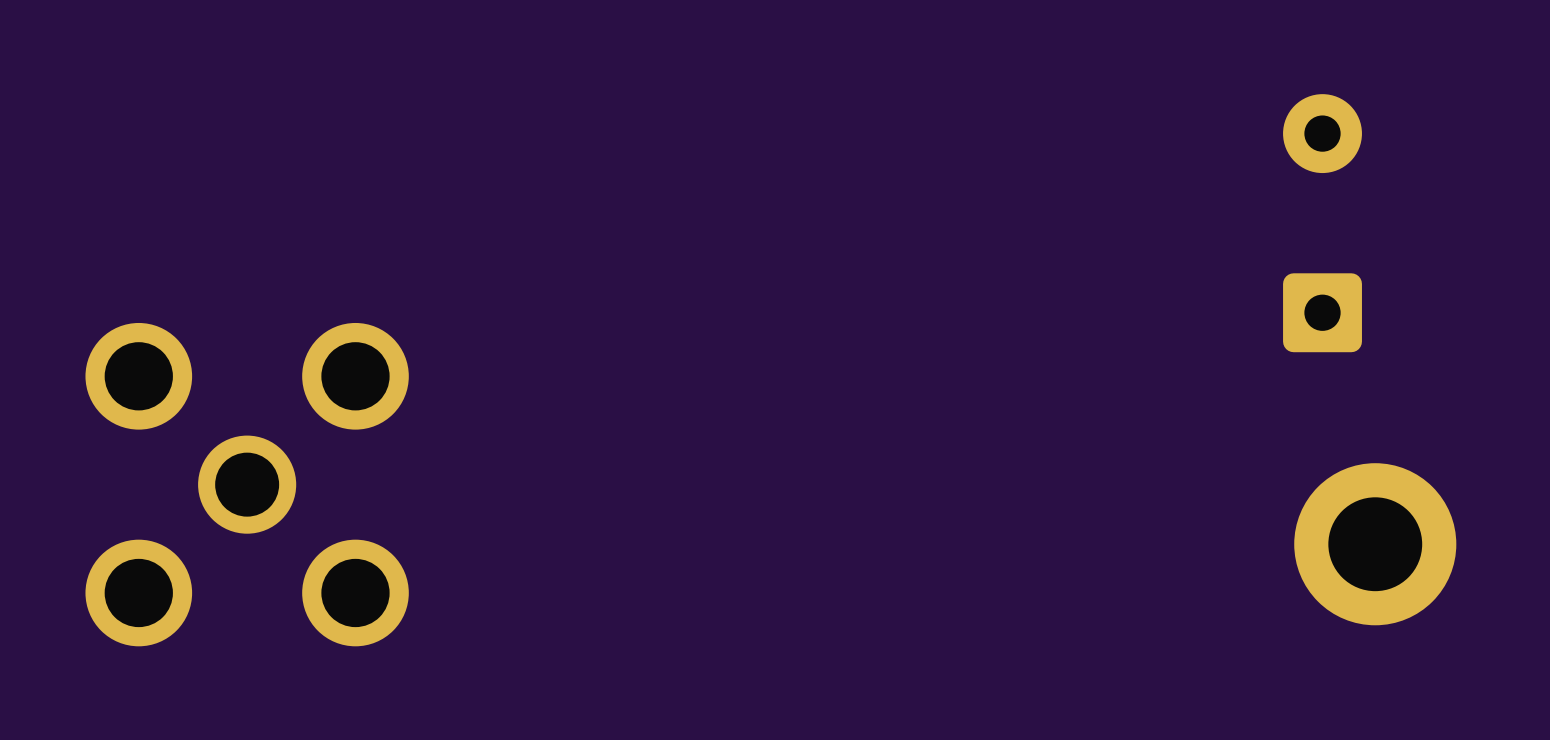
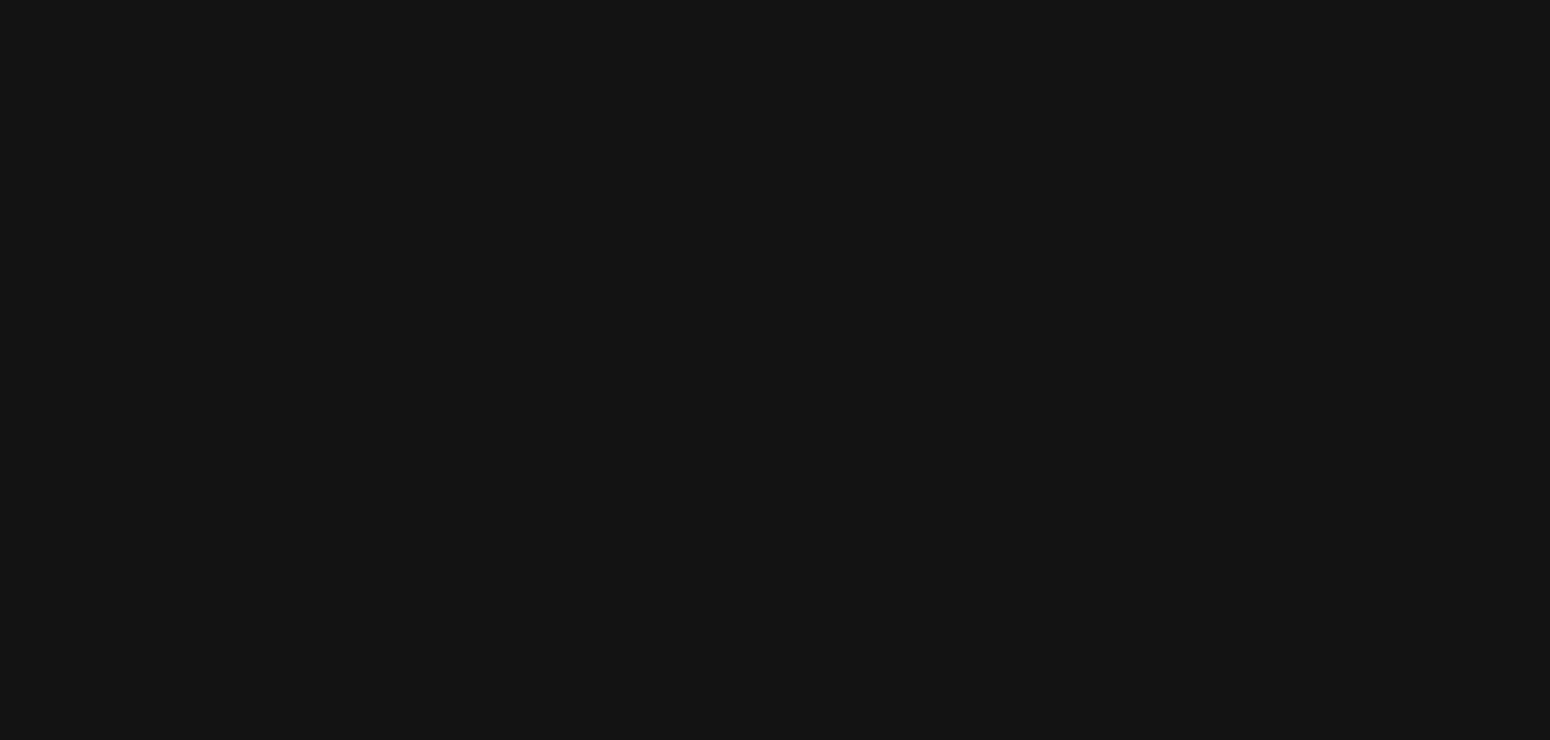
part: (1322, 223) -> none
part: (247, 484) -> none
part: (1375, 544) -> none

